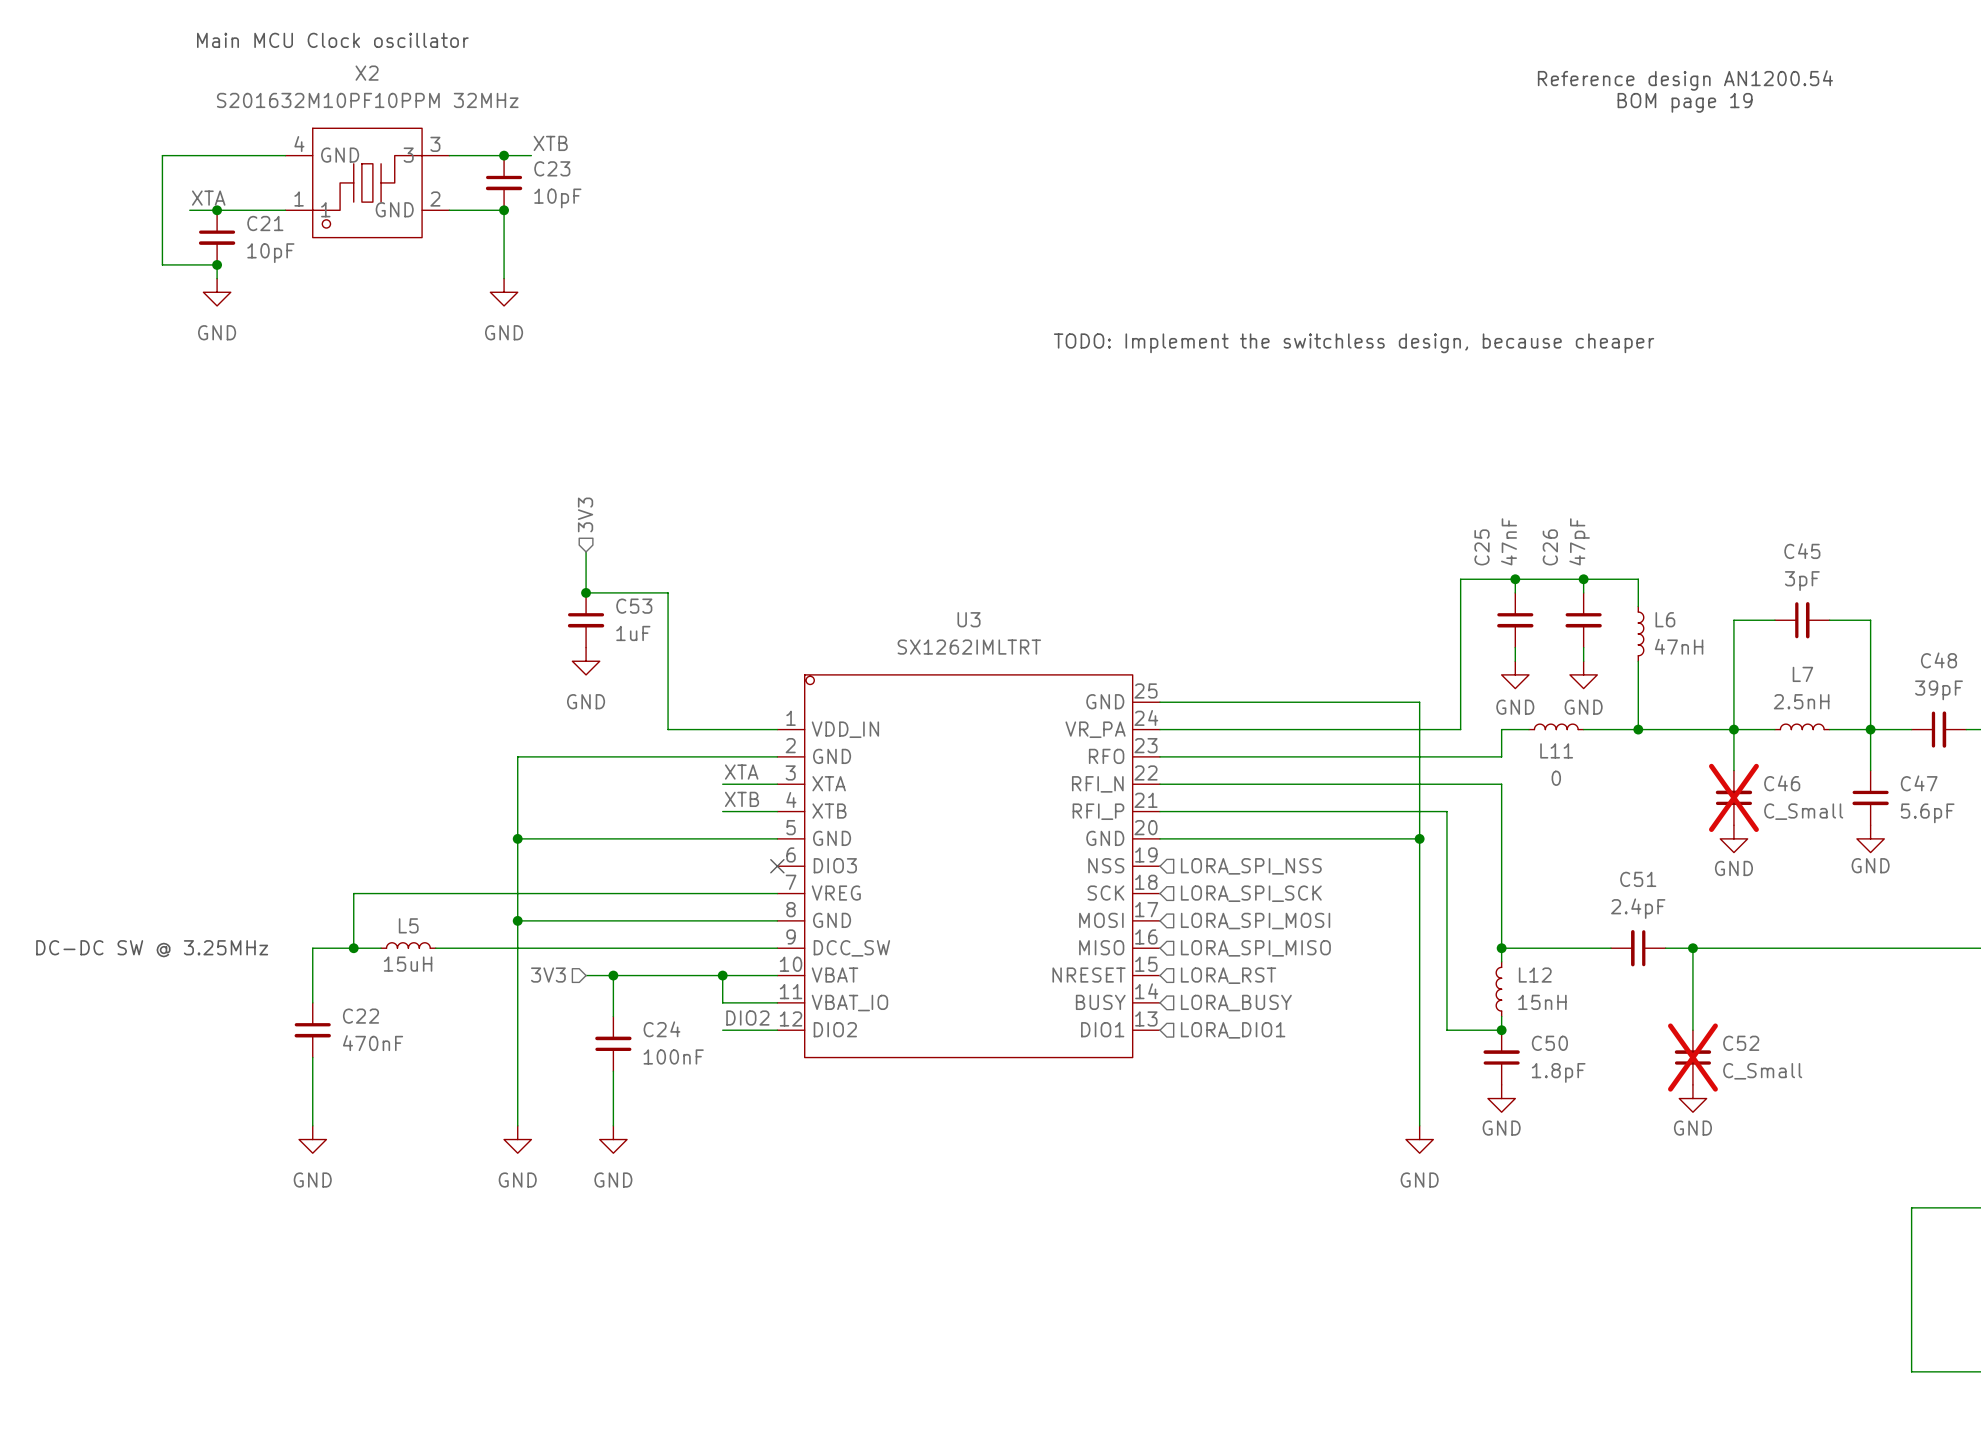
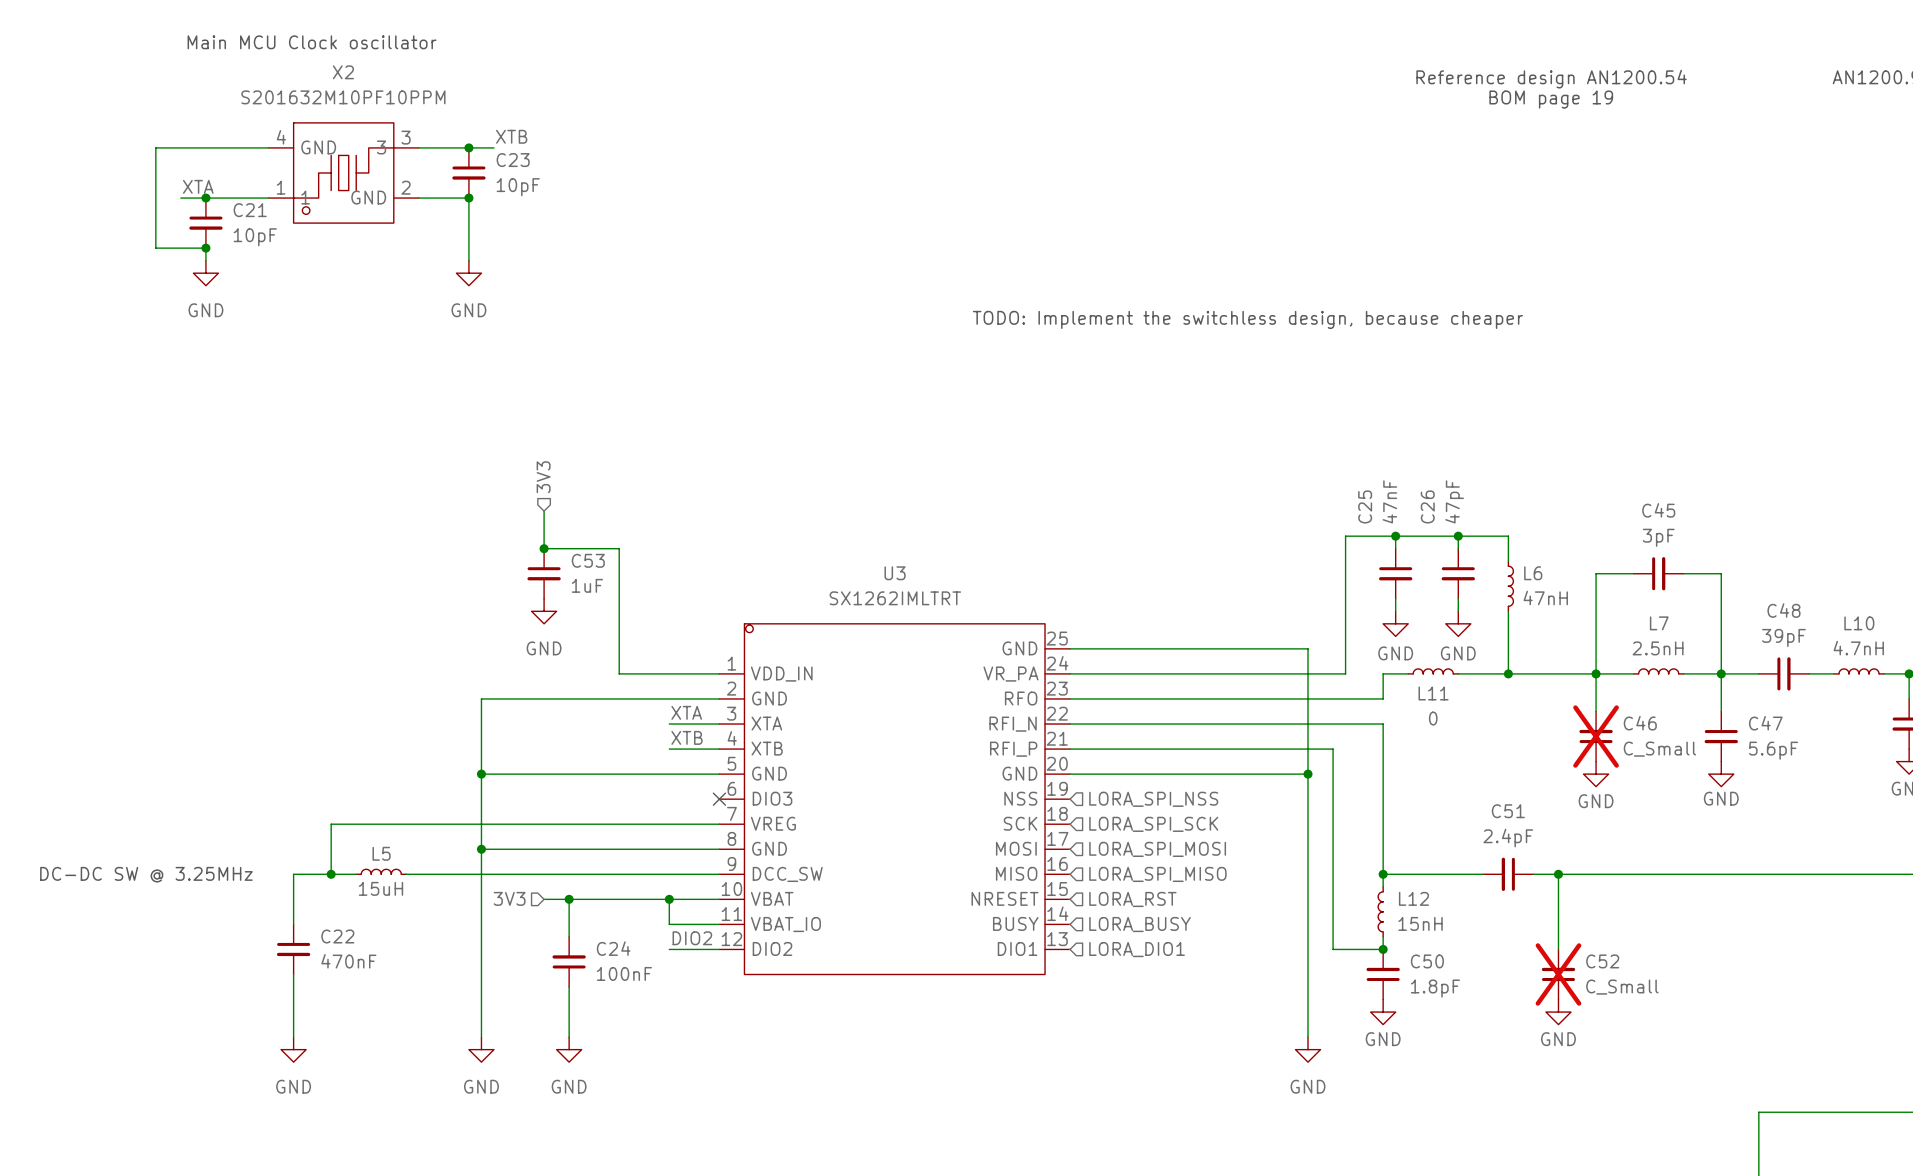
X2 value: S201632M10PF10PPM 32MHz (367, 100) -> S201632M10PF10PPM (343, 97)

